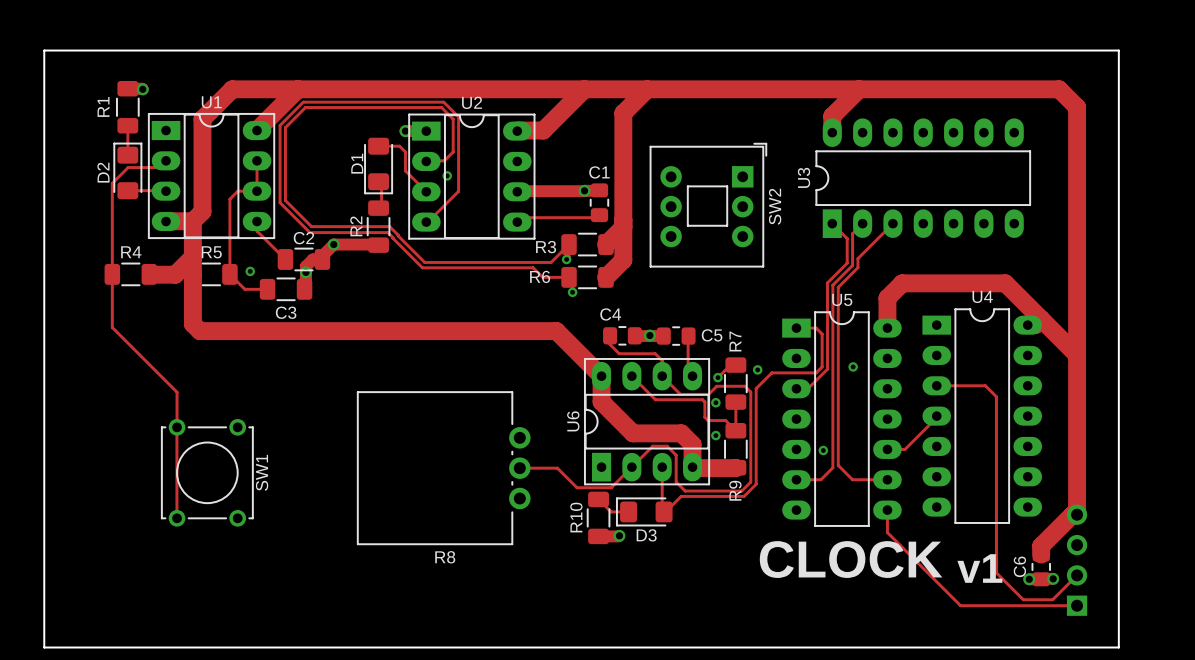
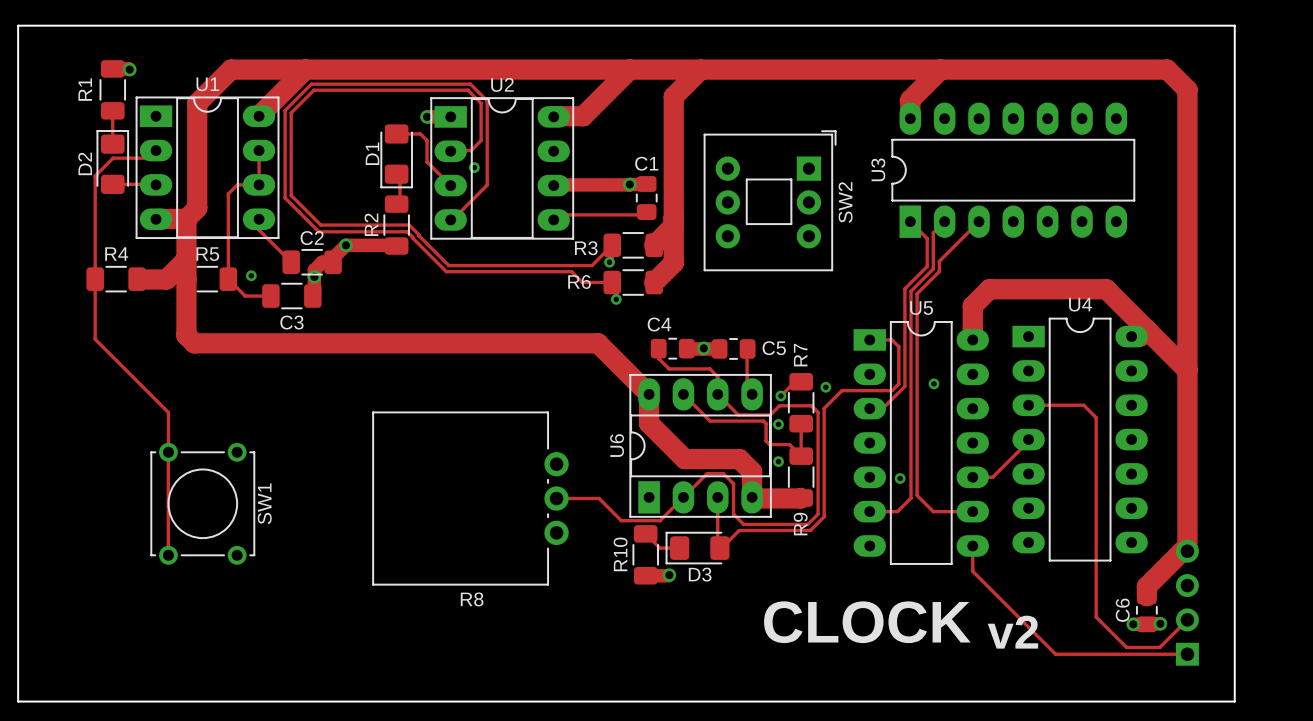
text: CLOCK v1 (881, 561) -> CLOCK v2 (901, 624)

